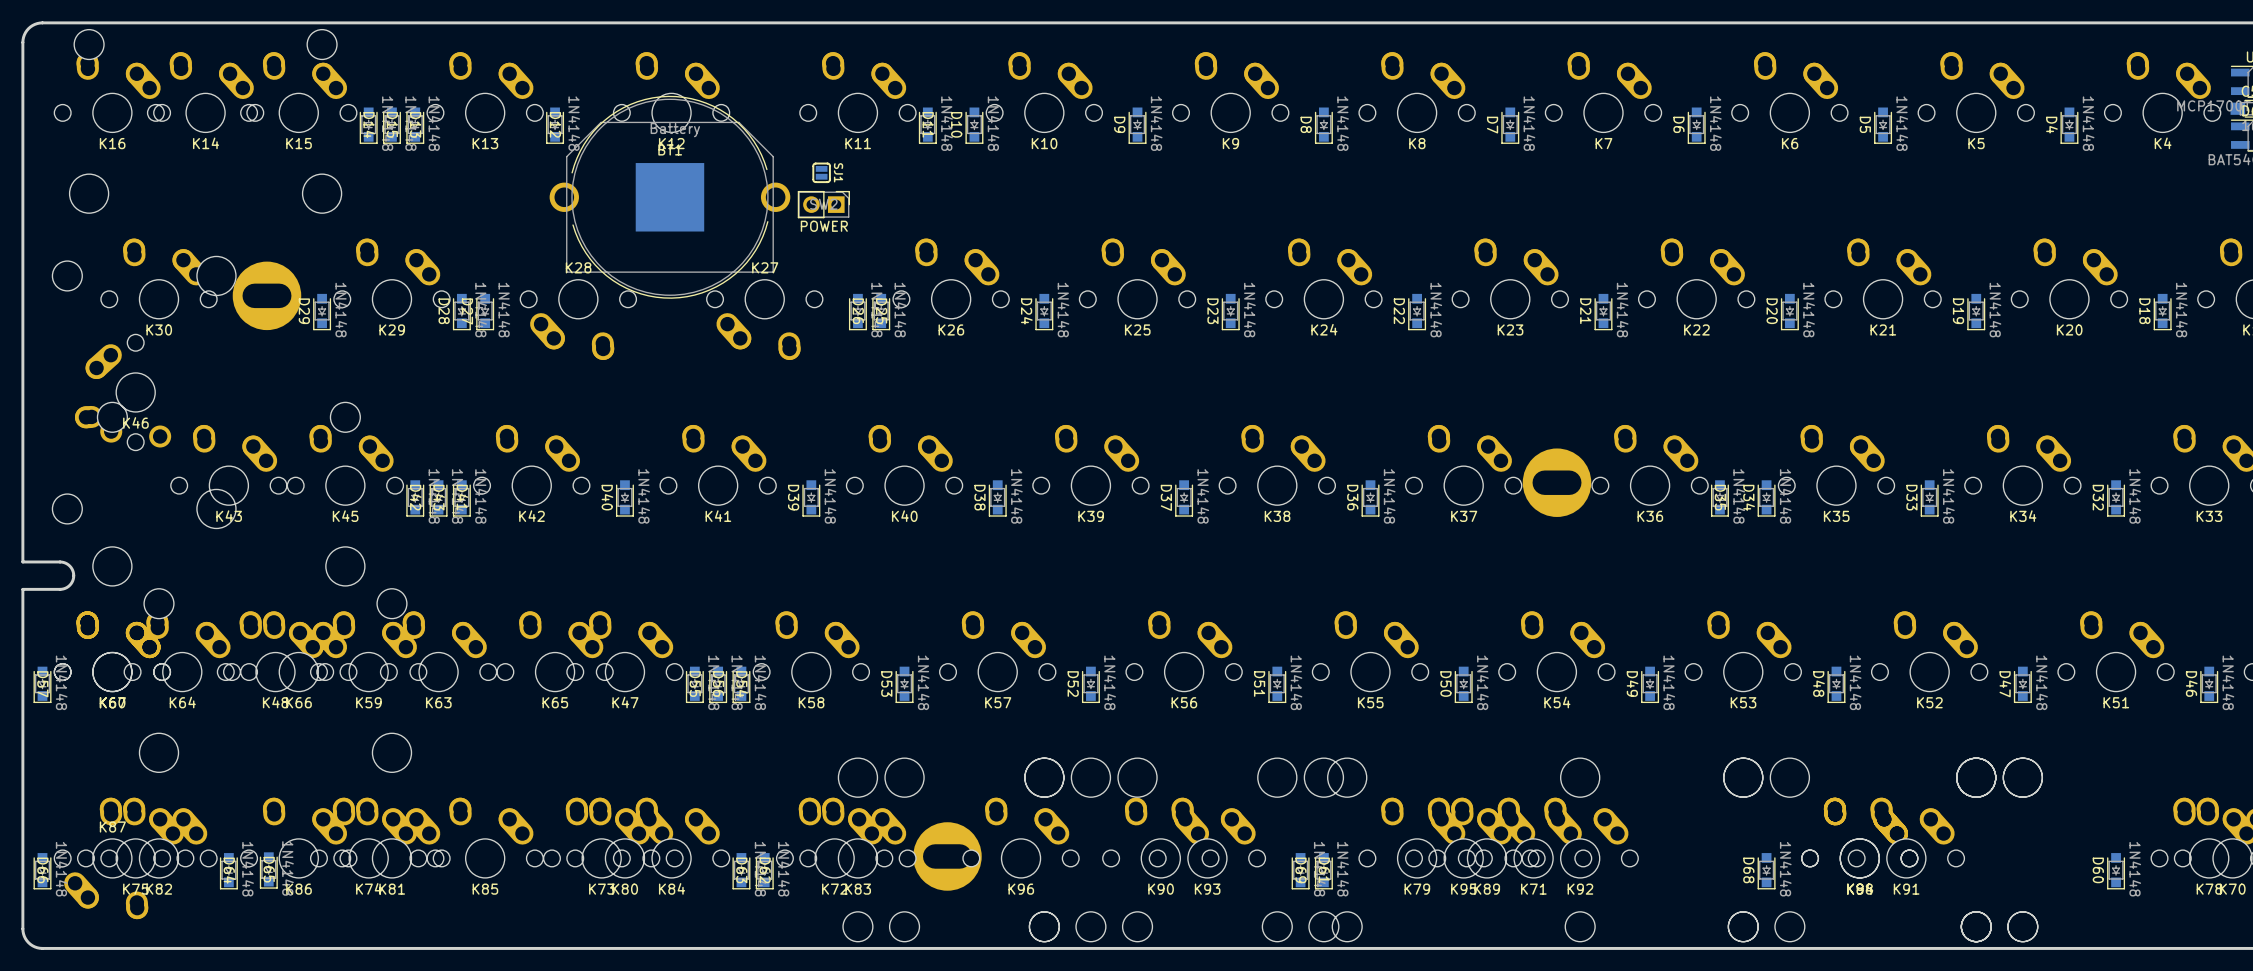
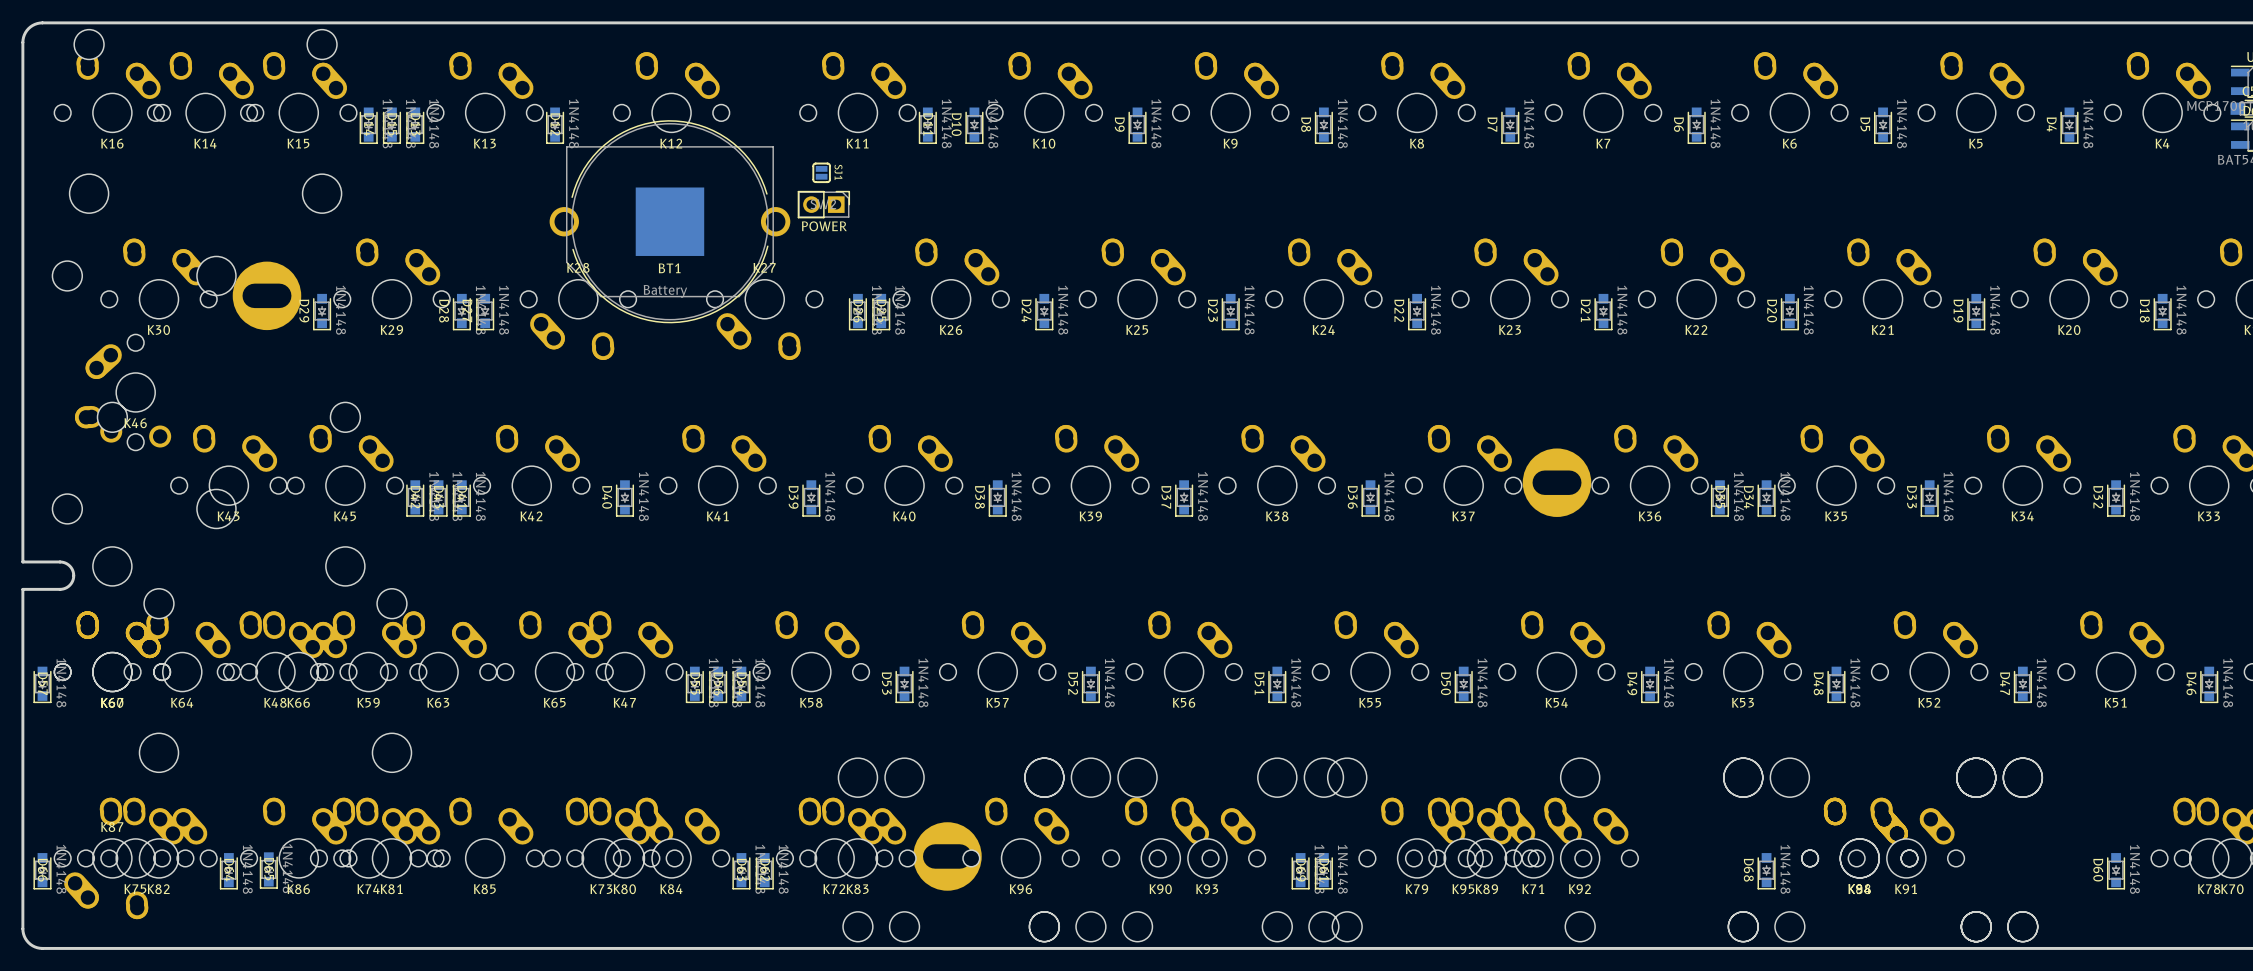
BT1 rotation: 0° (669, 197) -> 180° (669, 221)

